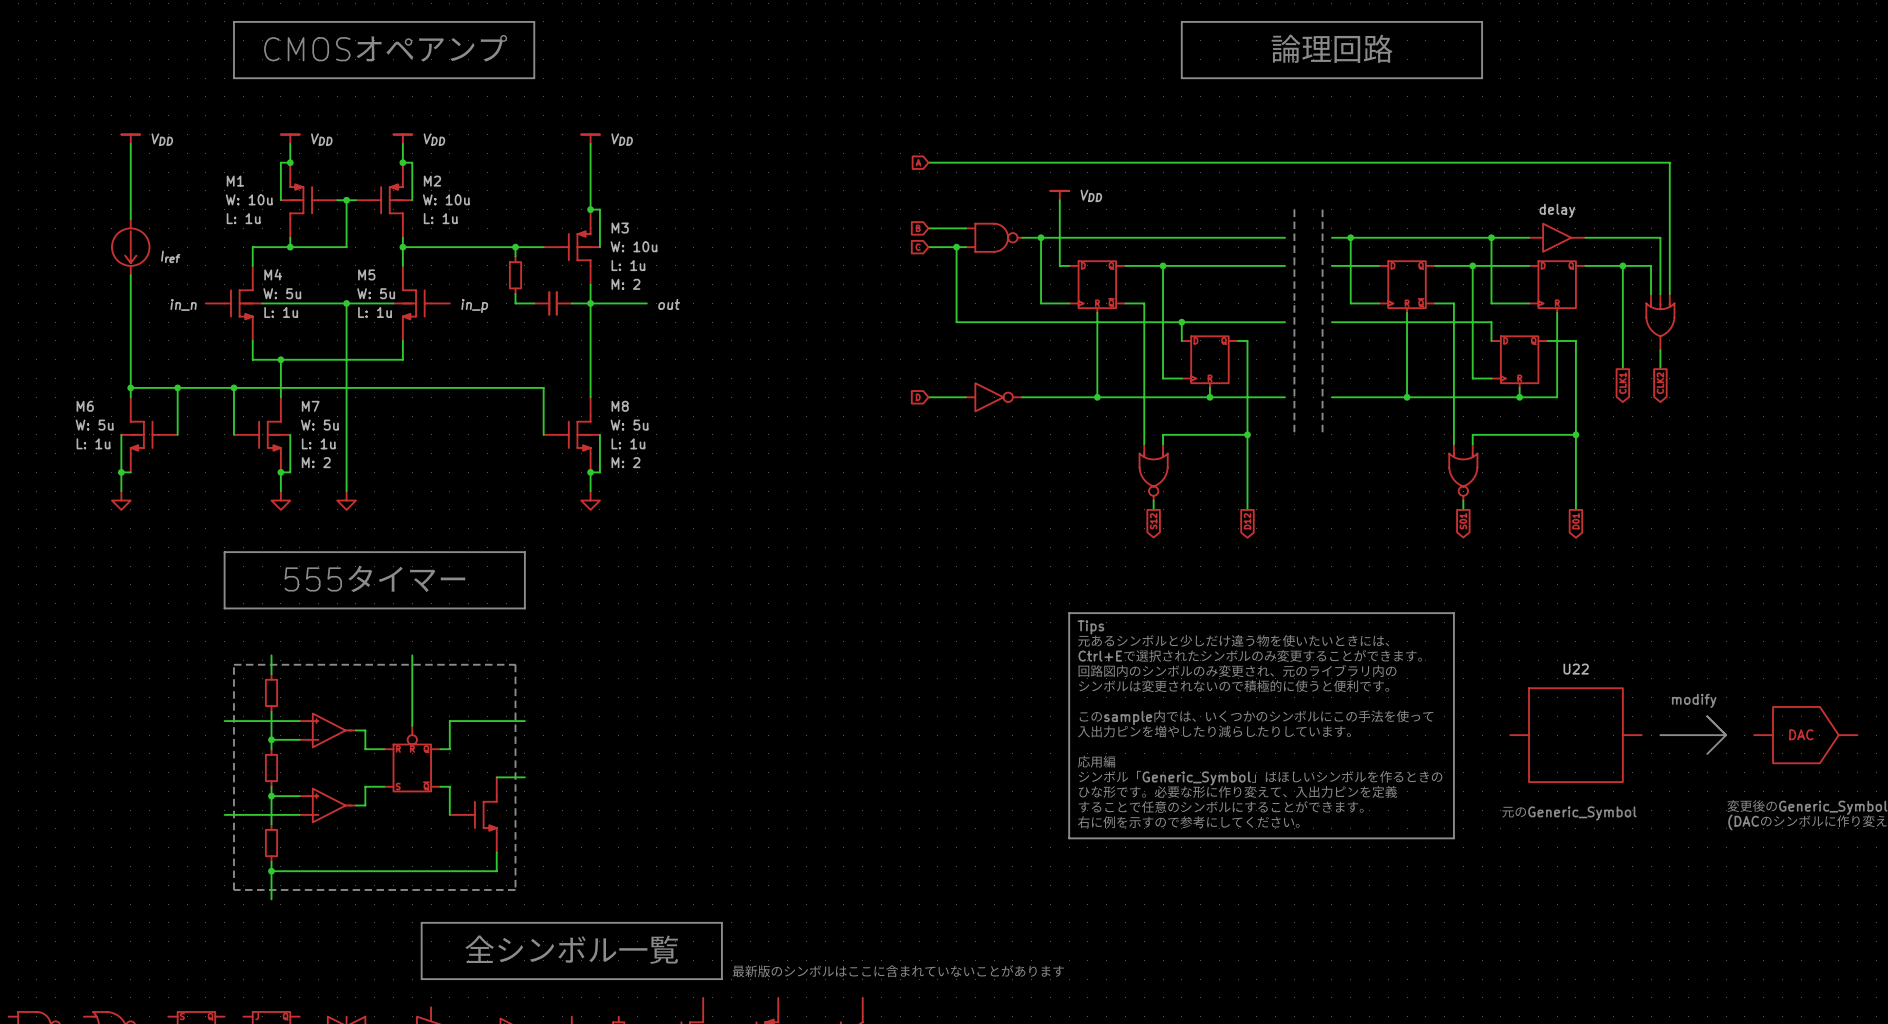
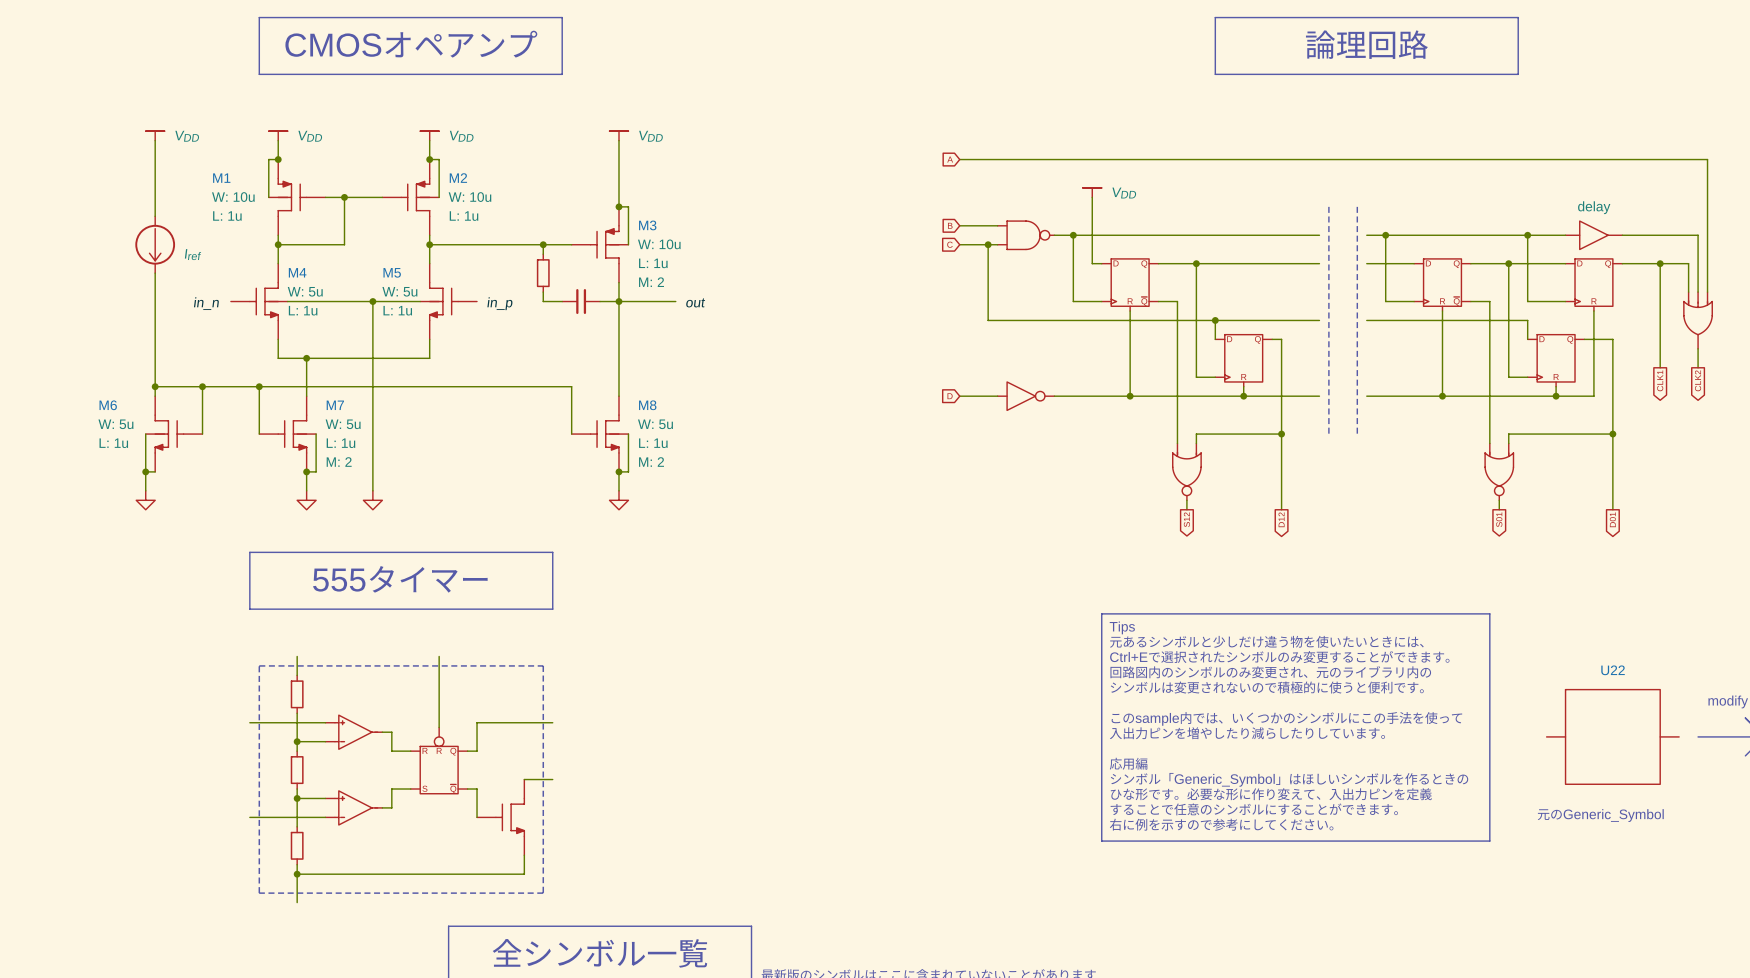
part position: (290, 139) -> (278, 135)
wire: (290, 143) (290, 162) (280, 162) (280, 200) -> (278, 140) (278, 159) (268, 159) (268, 197)
junction: none -> (278, 159)
junction: (290, 162) -> none
M1 position: (309, 200) -> (297, 197)
junction: none -> (344, 197)
wire: (346, 200) (346, 247) (318, 247) -> (344, 197) (344, 244)
junction: (346, 200) -> none
wire: (290, 237) (290, 247) -> (278, 235) (278, 244)
junction: none -> (278, 244)
junction: (290, 247) -> none

